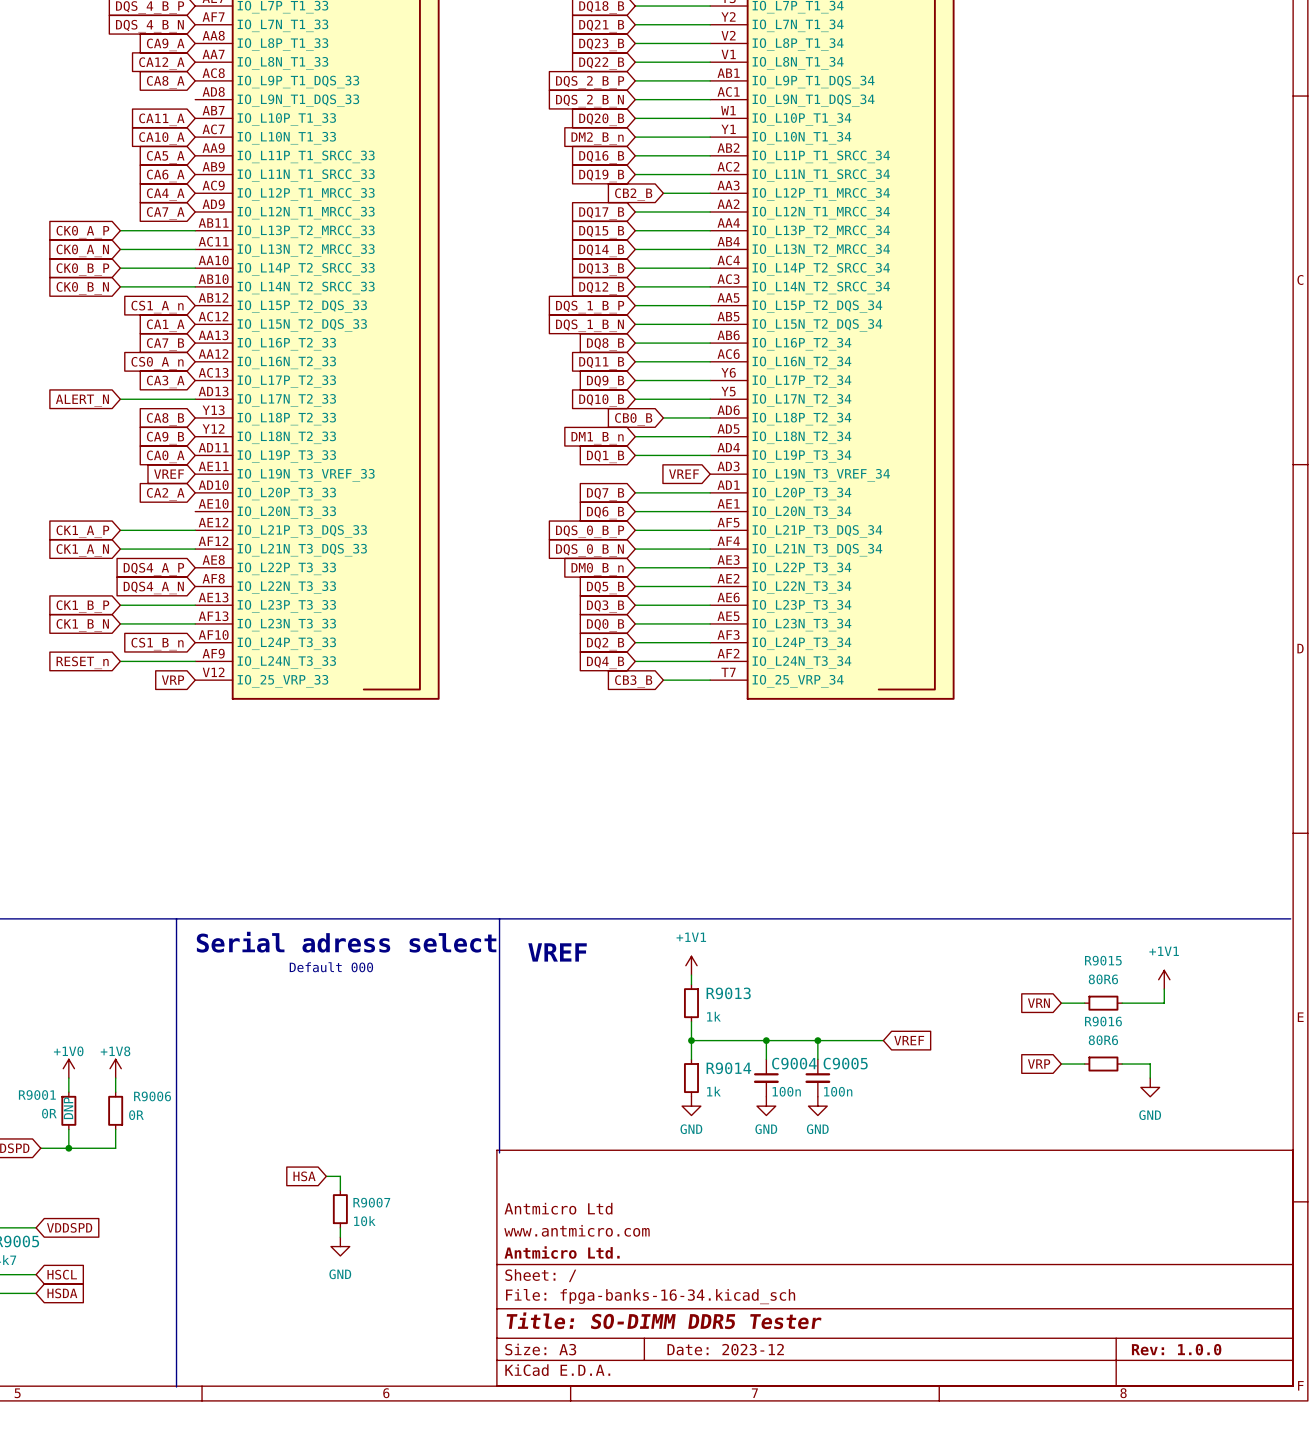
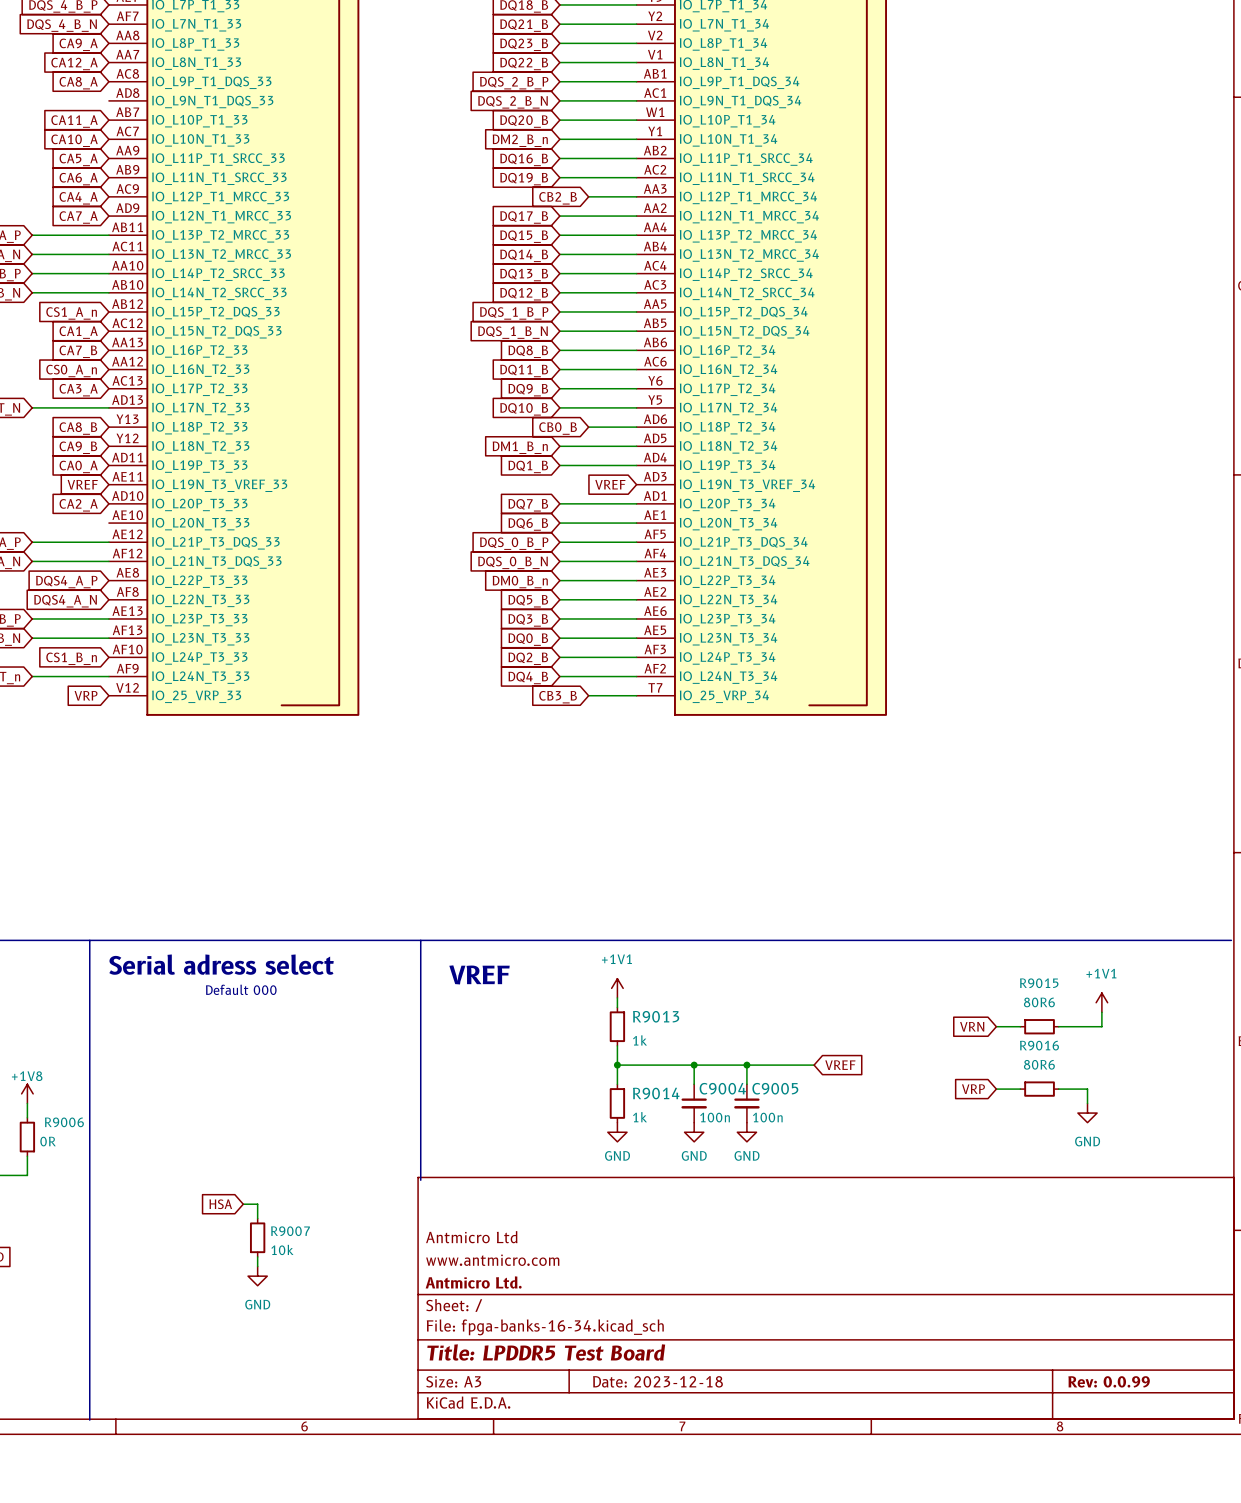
title block: Title: SO-DIMM DDR5 Tester (664, 1320) -> Title: LPDDR5 Test Board (546, 1352)
title block: Date: 2023-12 (725, 1349) -> Date: 2023-12-18 (657, 1381)
title block: Rev: 1.0.0 (1176, 1349) -> Rev: 0.0.99 (1109, 1381)

